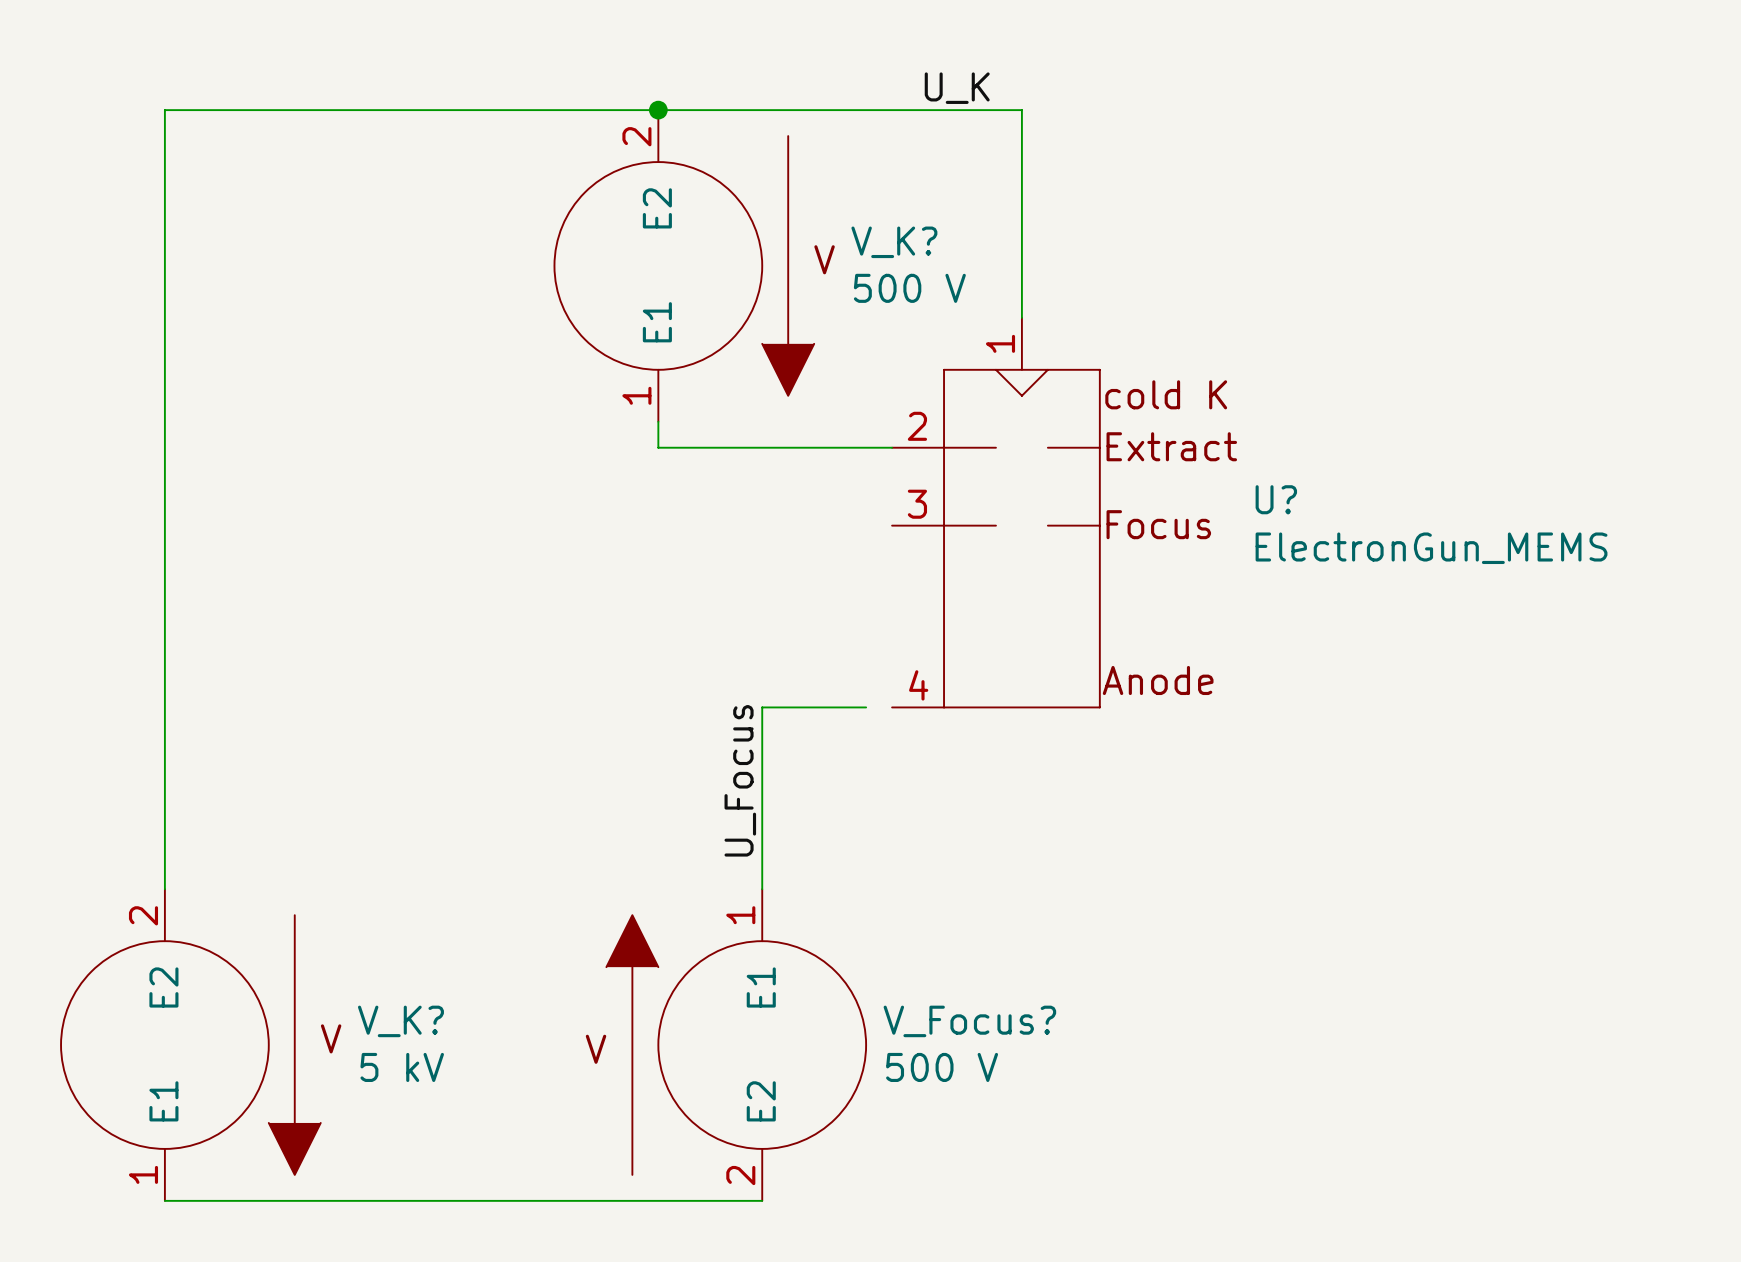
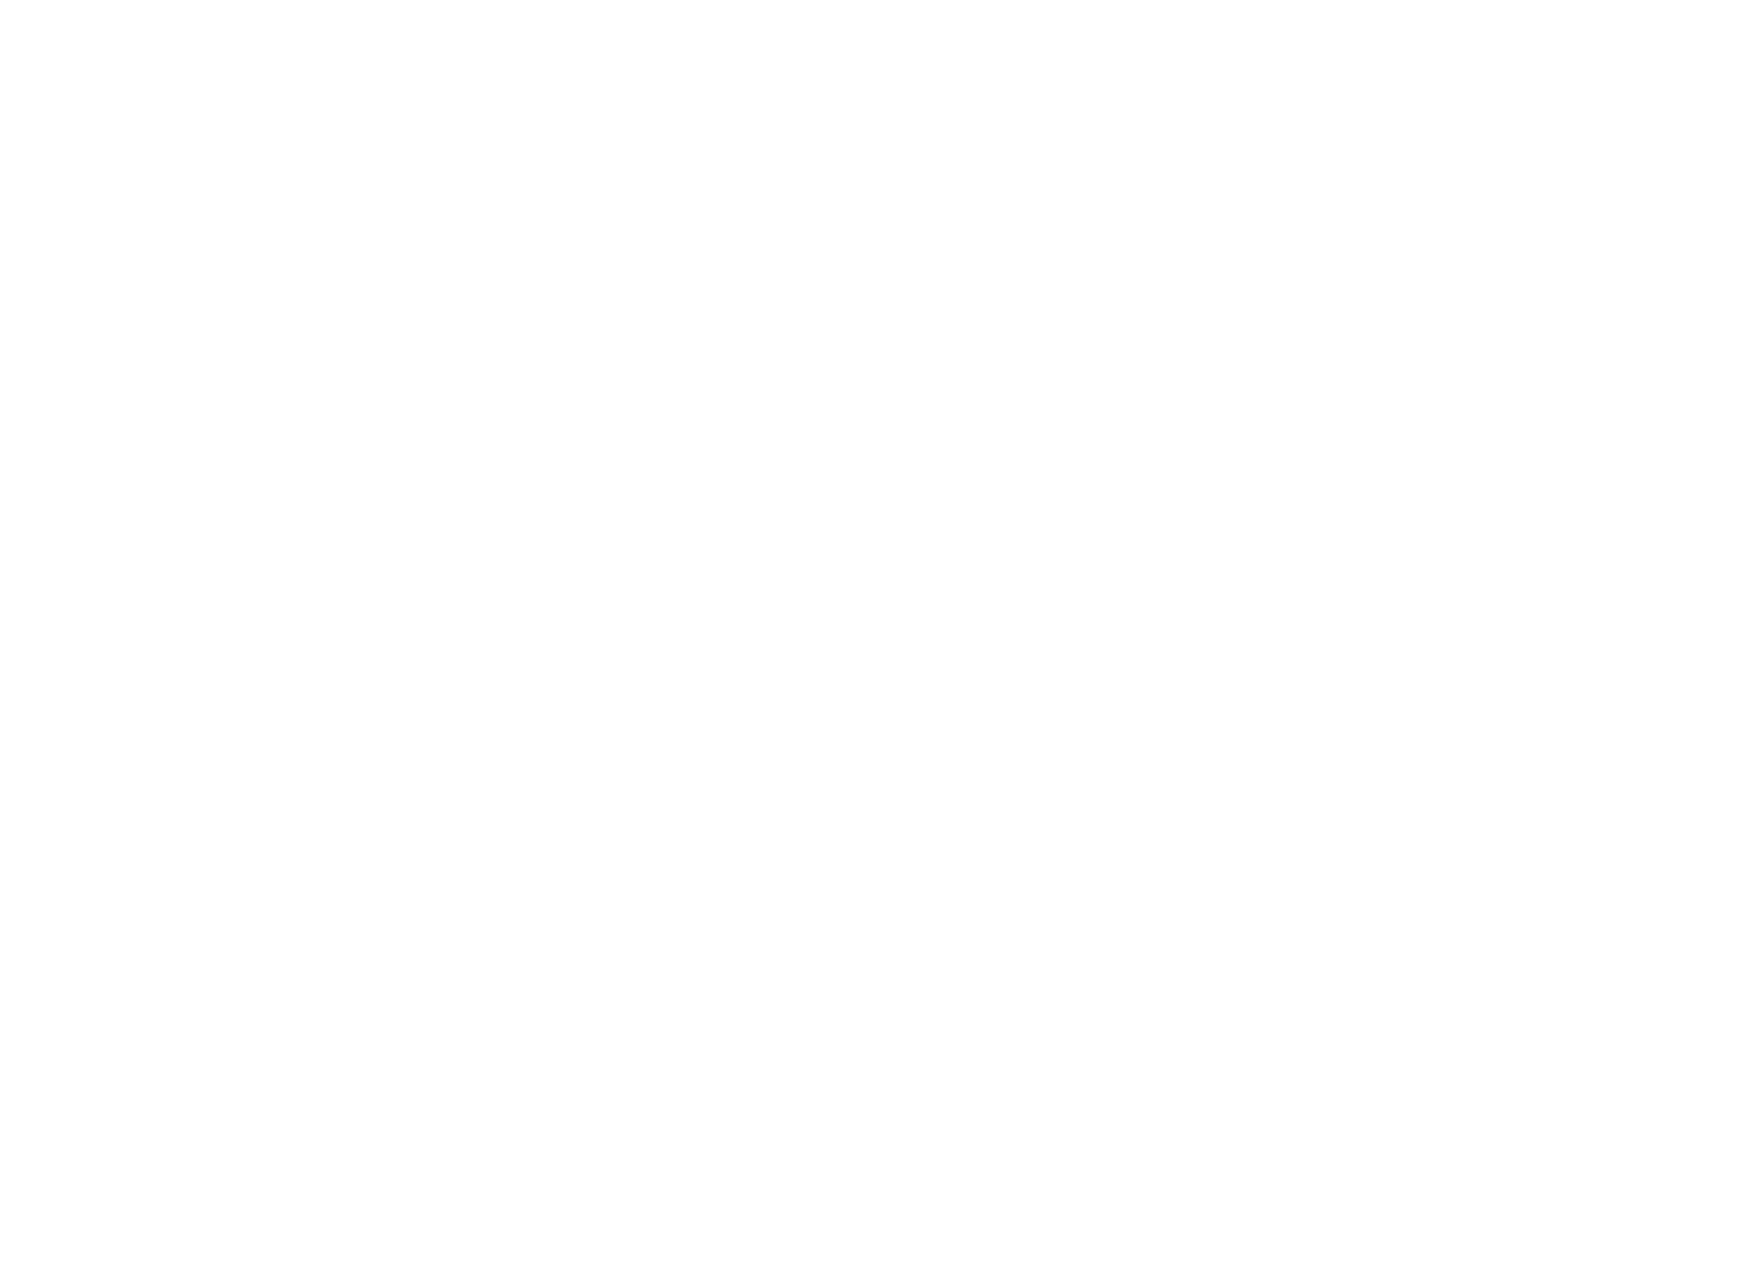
label: U_K (957, 88) -> none
junction: (658, 110) -> none
V_K?: 500 V (684, 265) -> none
wire: (1021, 317) (1021, 110) (164, 110) (164, 889) -> none
wire: (658, 421) (658, 447) (892, 447) -> none
U?: ElectronGun_MEMS (995, 512) -> none
wire: (866, 707) (762, 707) (762, 889) -> none
label: U_Focus (740, 780) -> none
V_K?: 5 kV (190, 1045) -> none
V_Focus?: 500 V (736, 1045) -> none
wire: (164, 1200) (762, 1200) -> none

